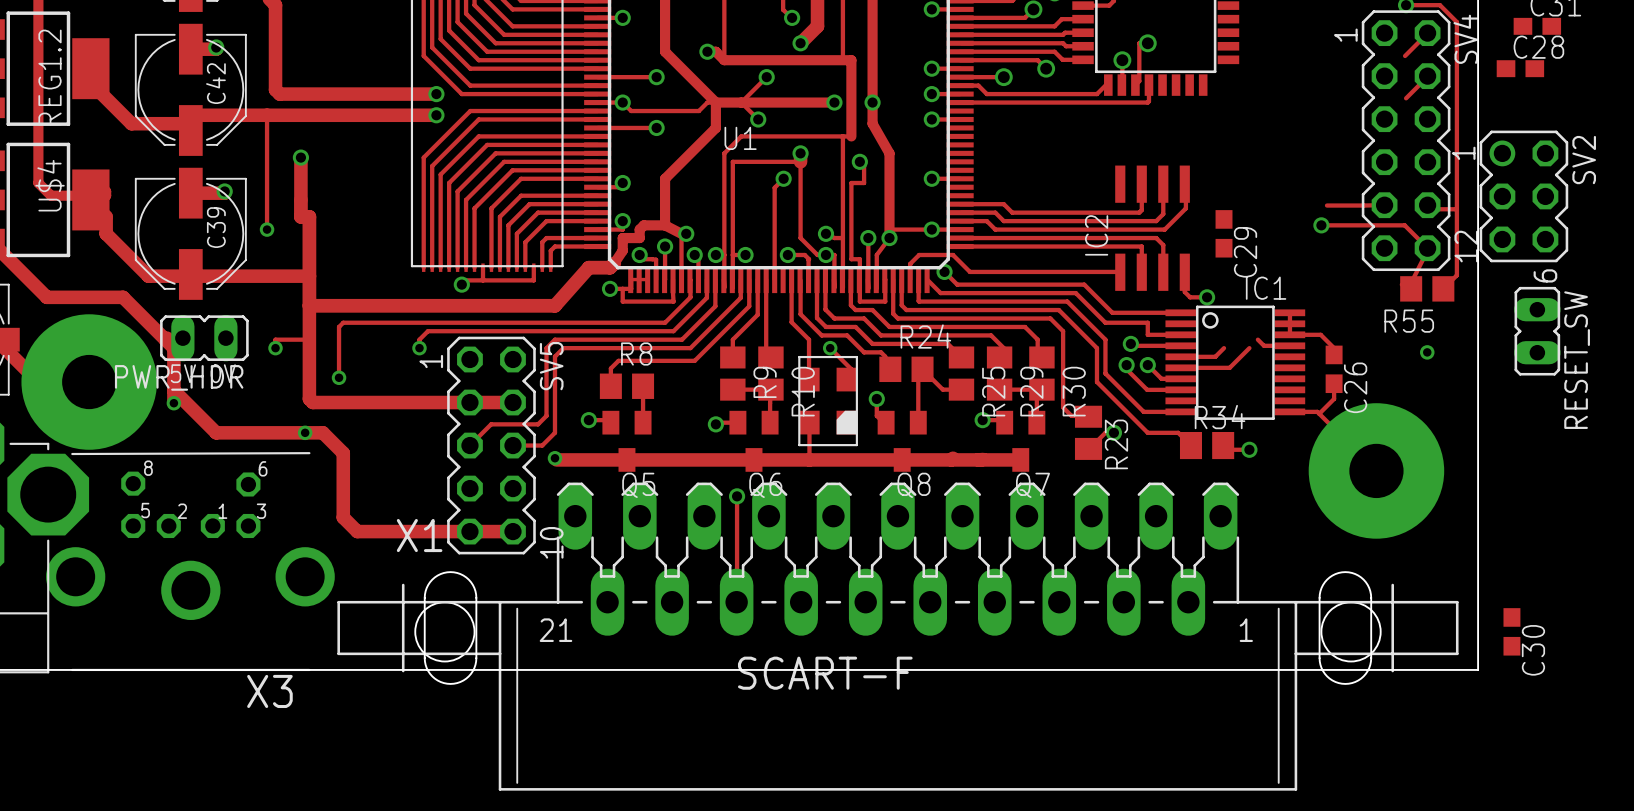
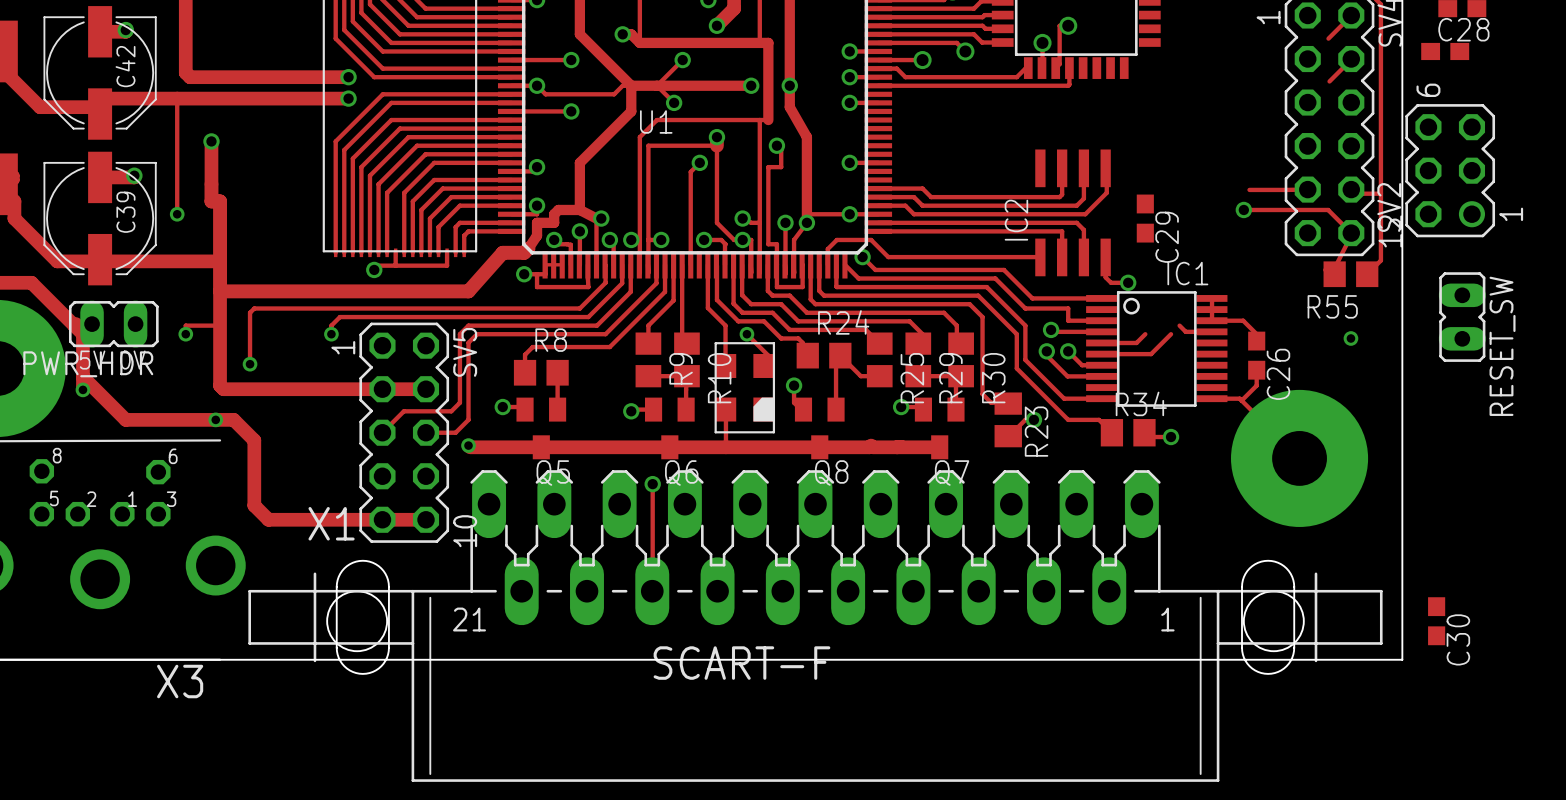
SV2 footprint: [1479, 130, 1569, 263] -> [1405, 104, 1496, 238]
SV2 name position: SV2 (1584, 160) -> SV2 (1389, 207)

